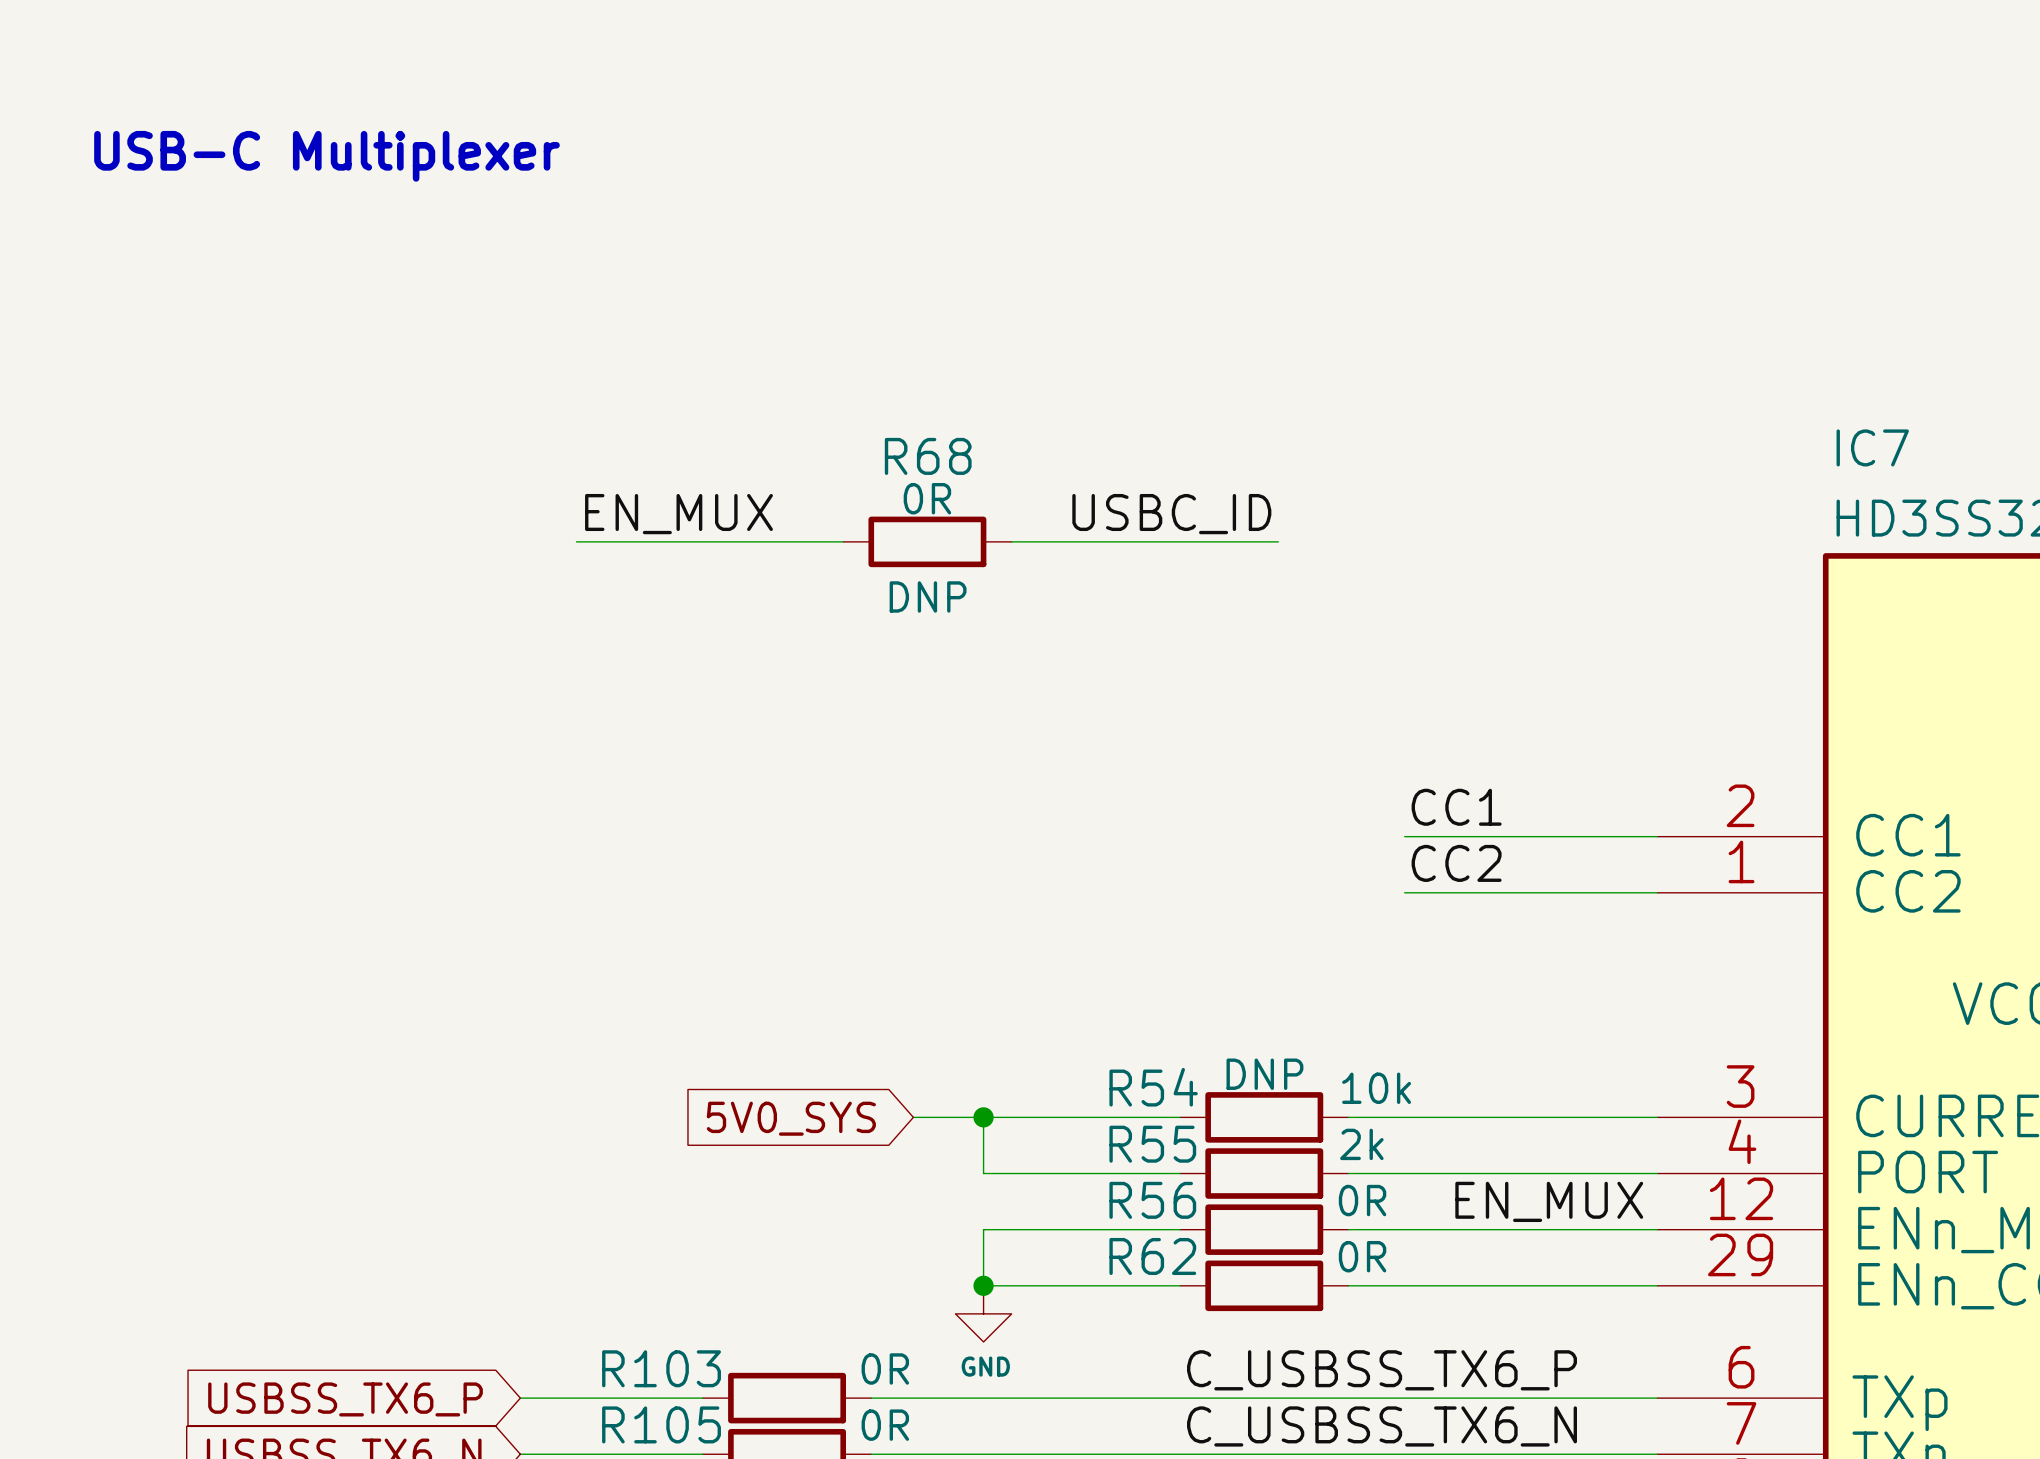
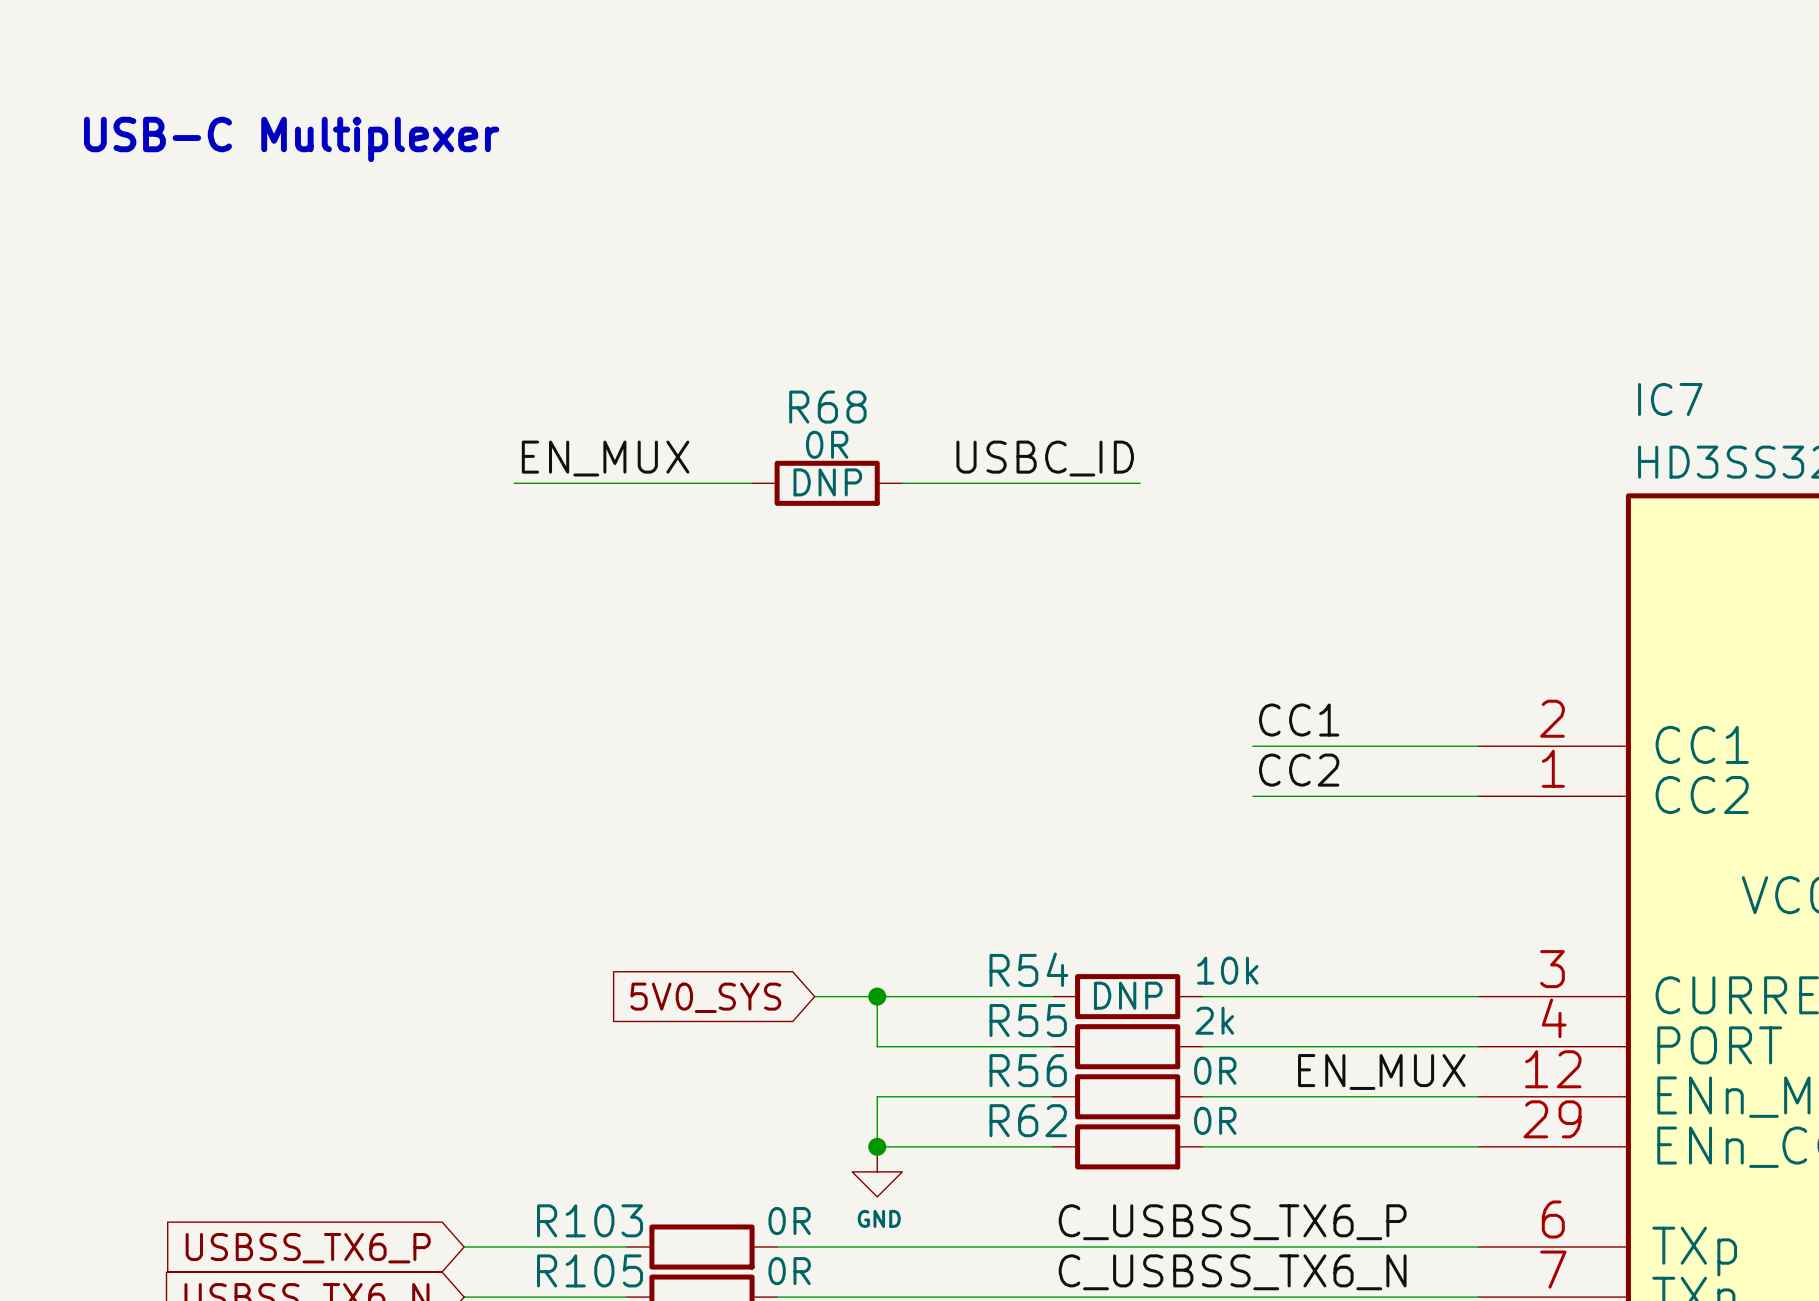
R68 text position: DNP (928, 596) -> DNP (827, 482)
R54 text position: DNP (1264, 1074) -> DNP (1128, 995)

